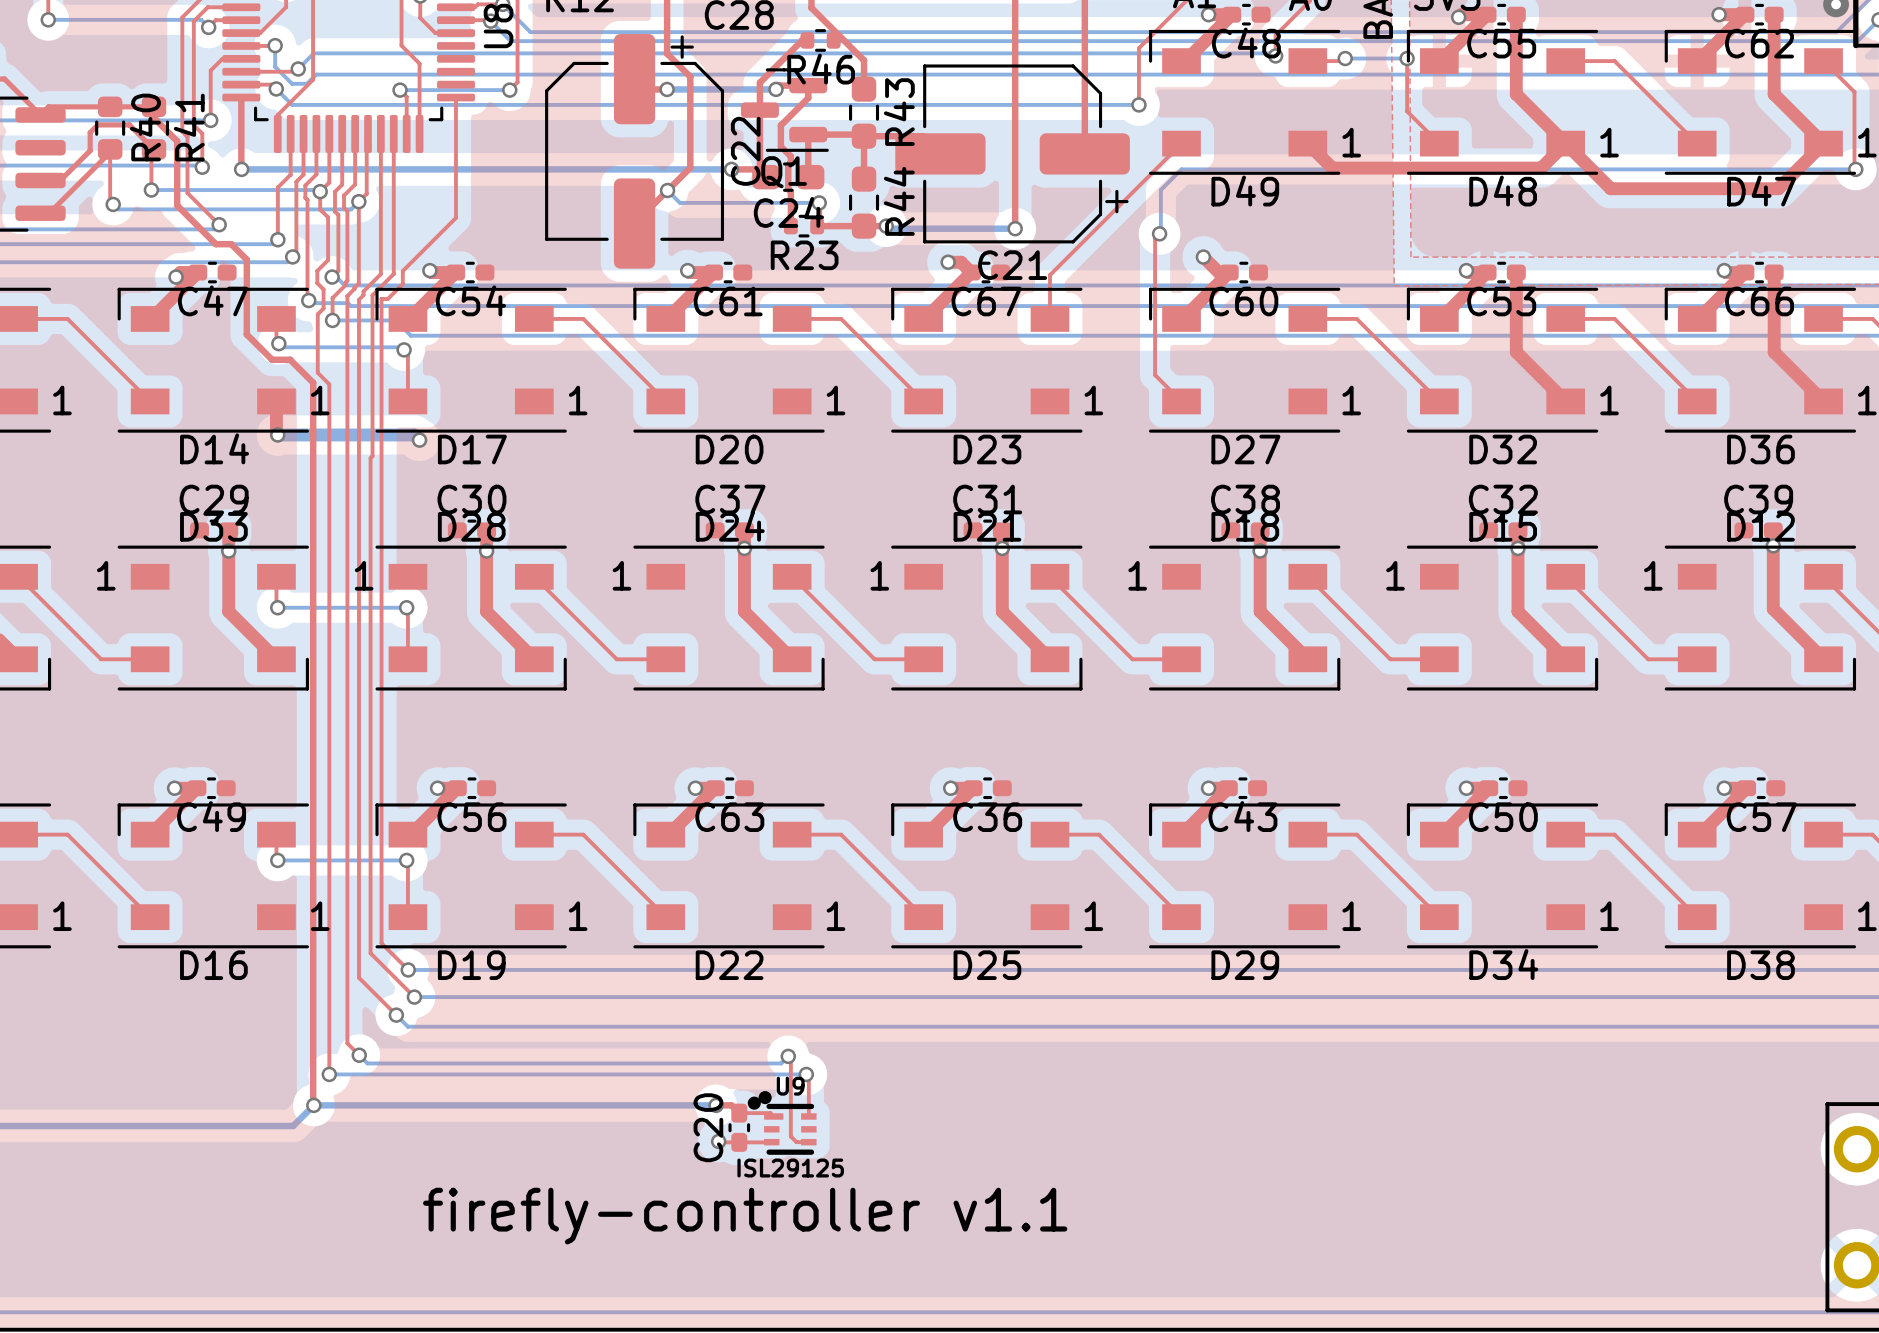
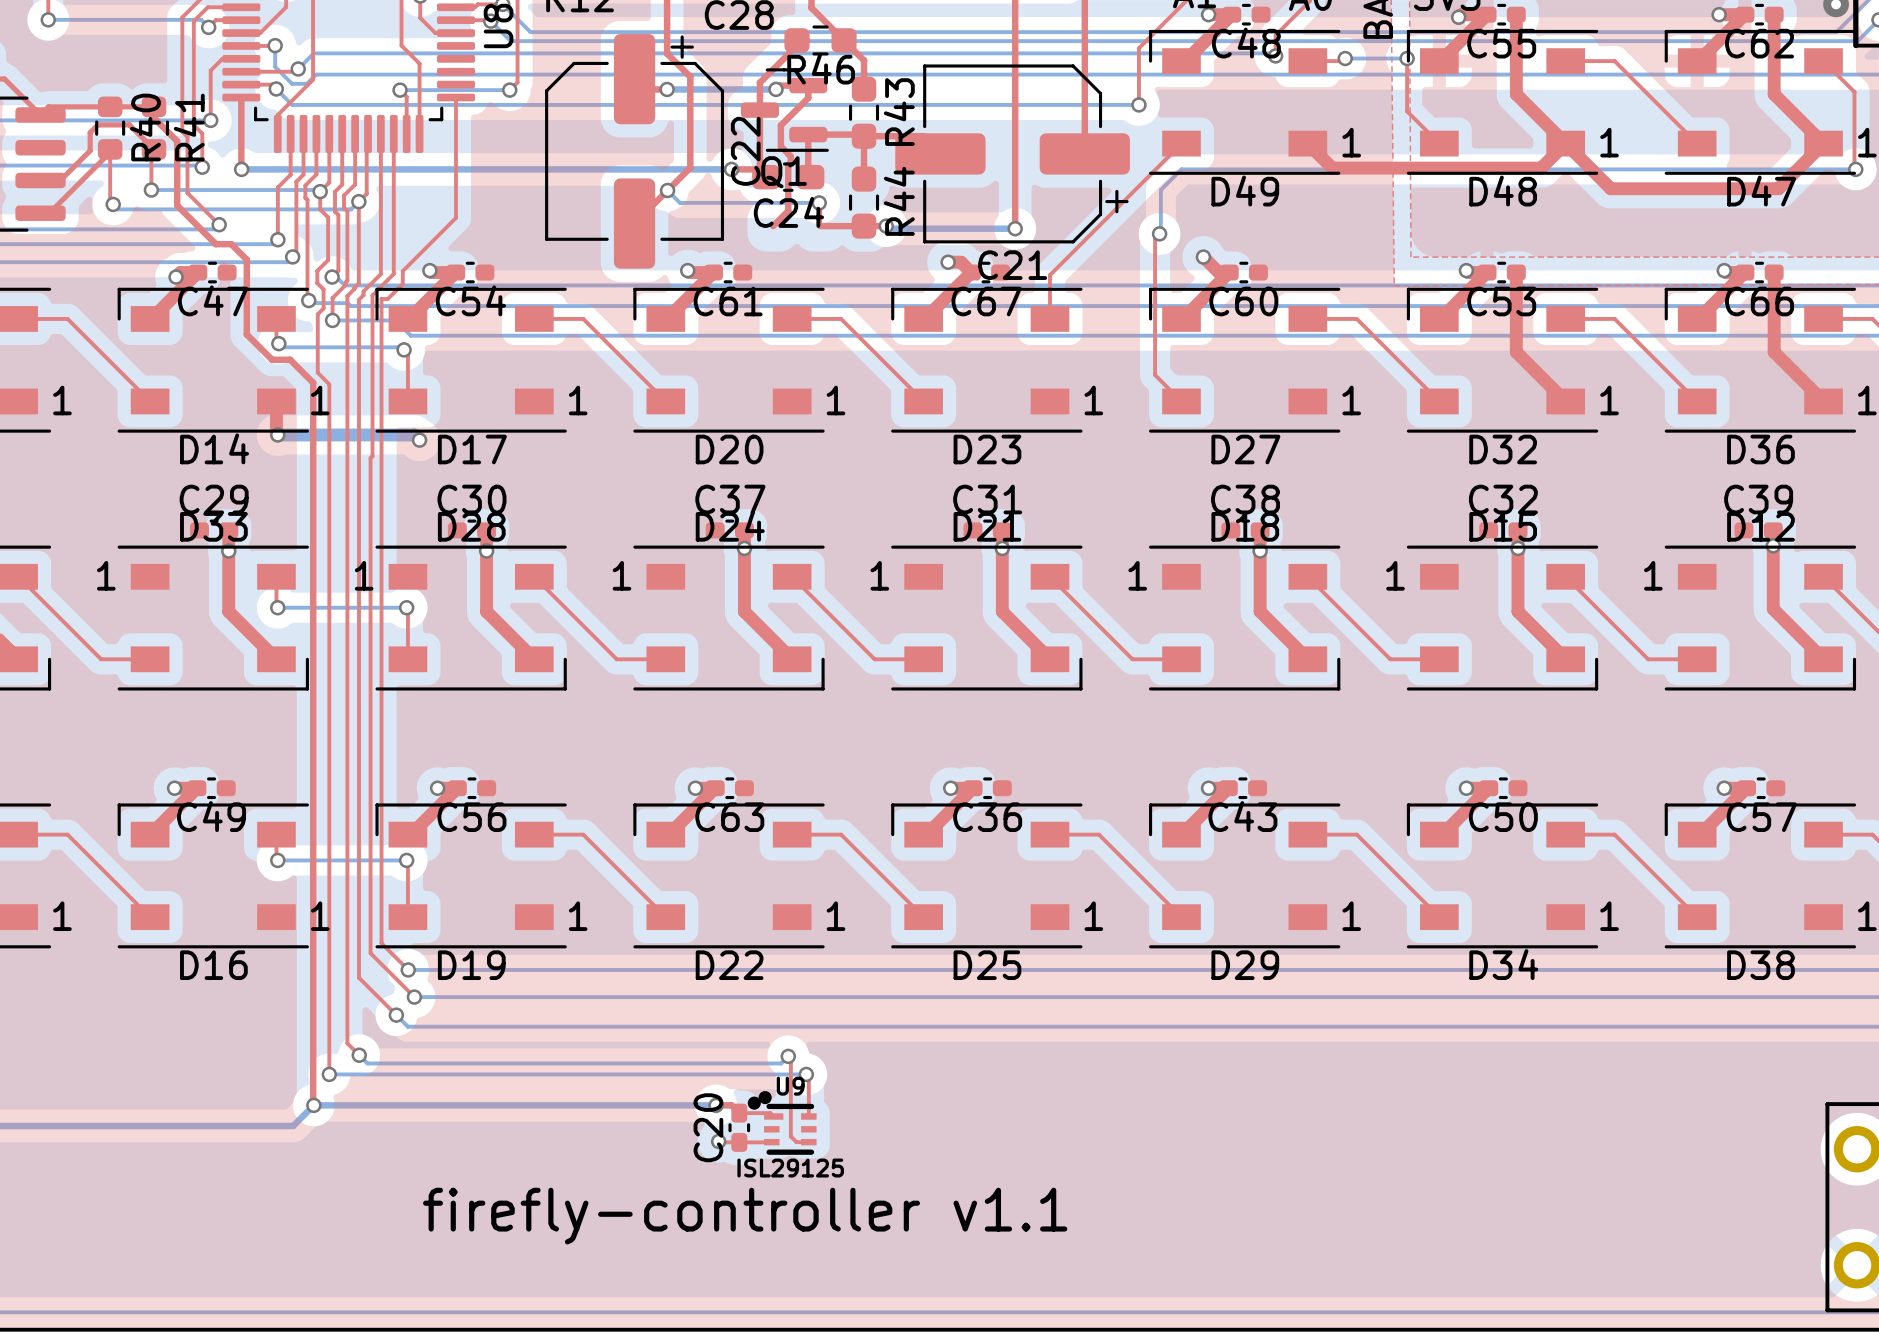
R46 footprint: [800, 29, 841, 52] -> [784, 25, 857, 56]
top track: (788, 189) (790, 191) (790, 226) -> (788, 189) (788, 210) (773, 226)
R23: (804, 226) -> none

